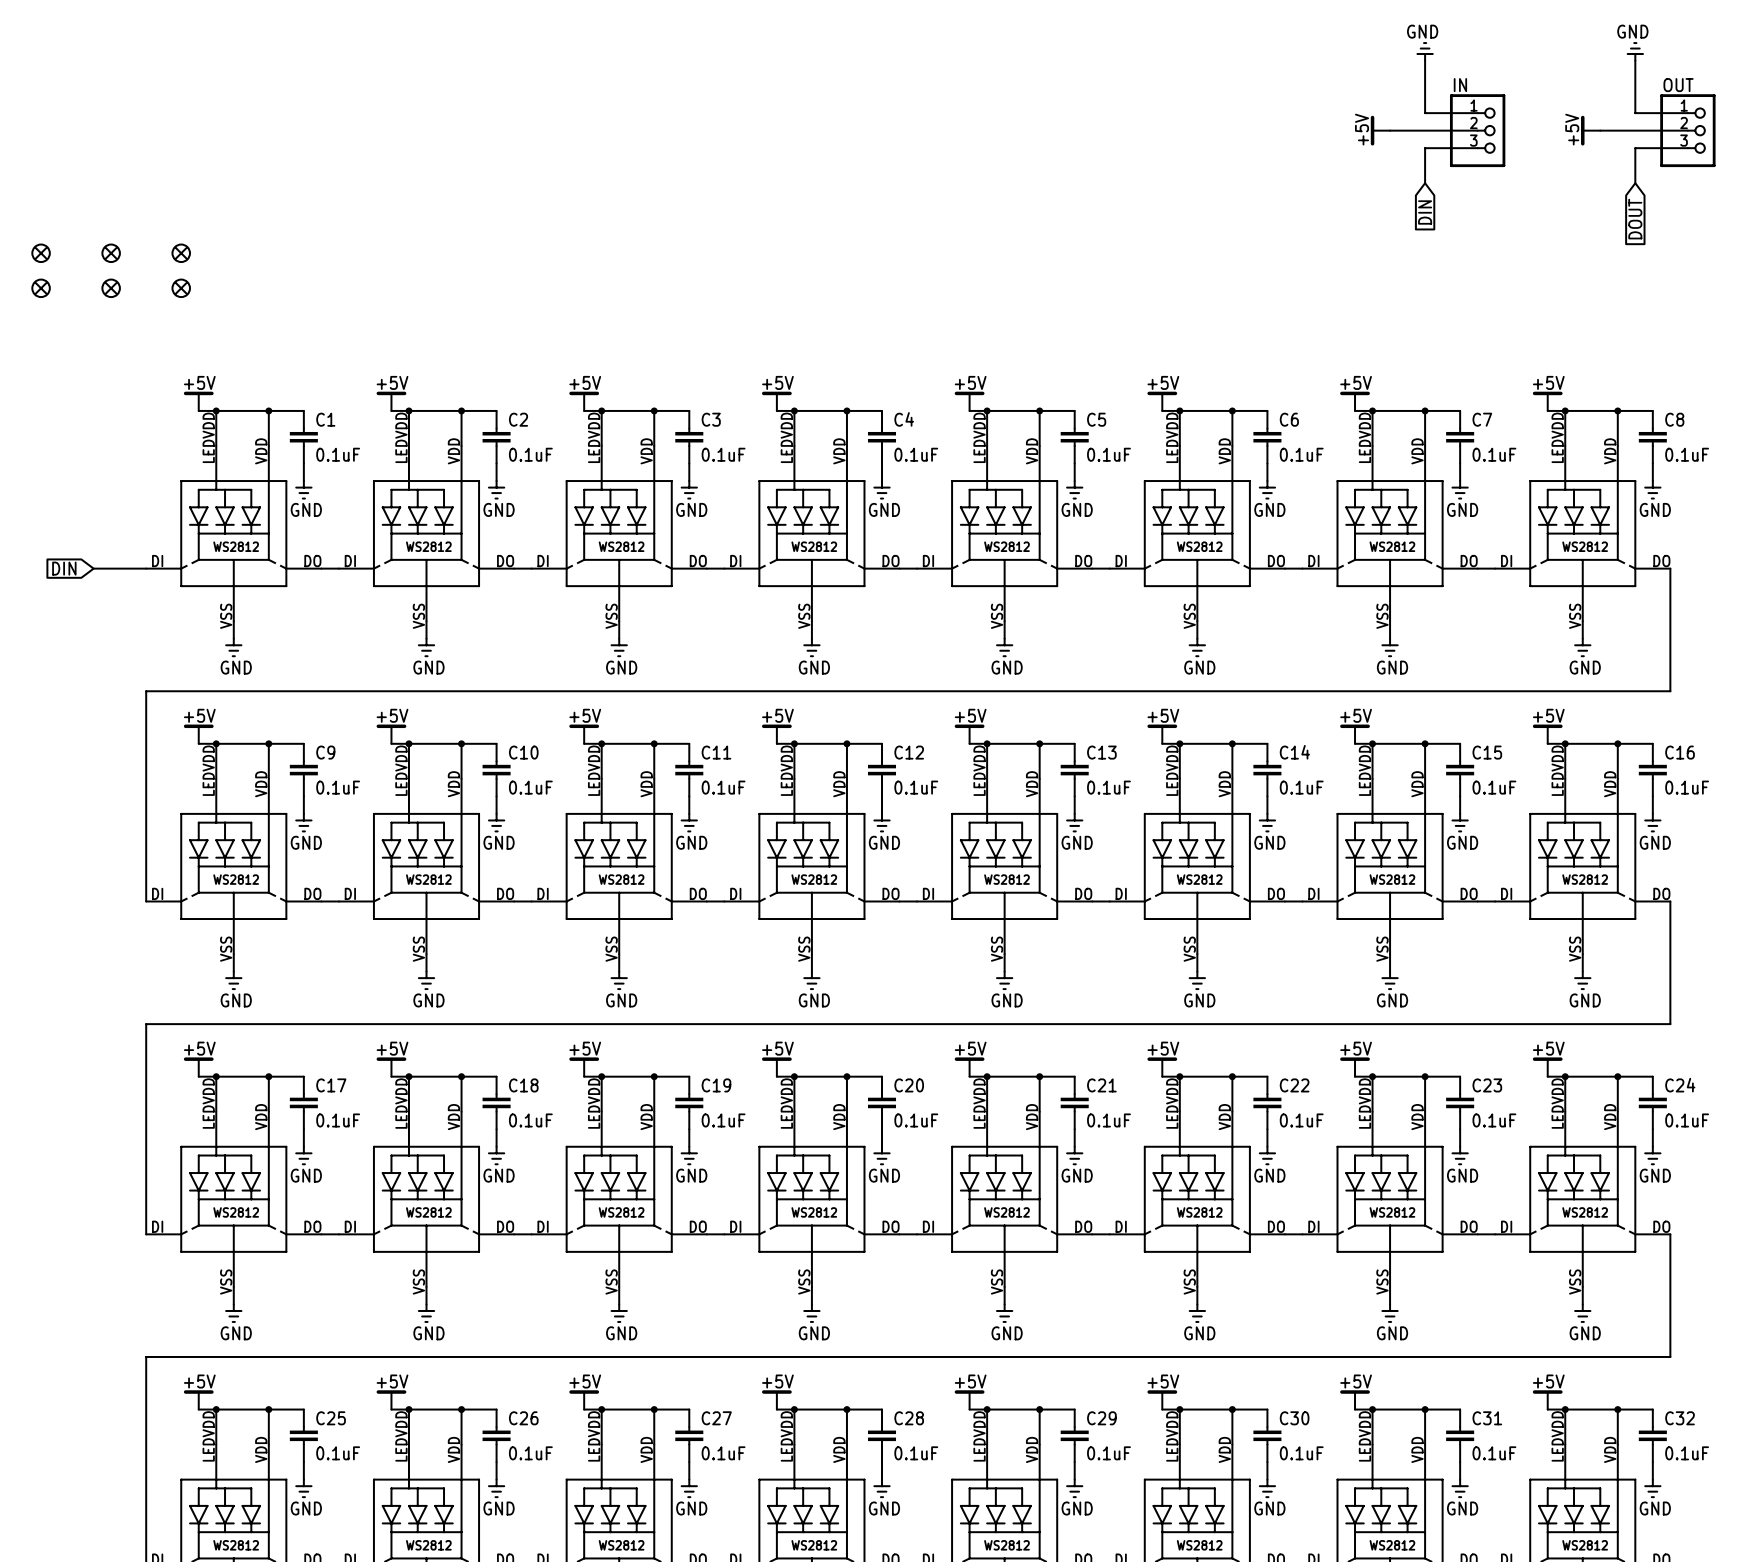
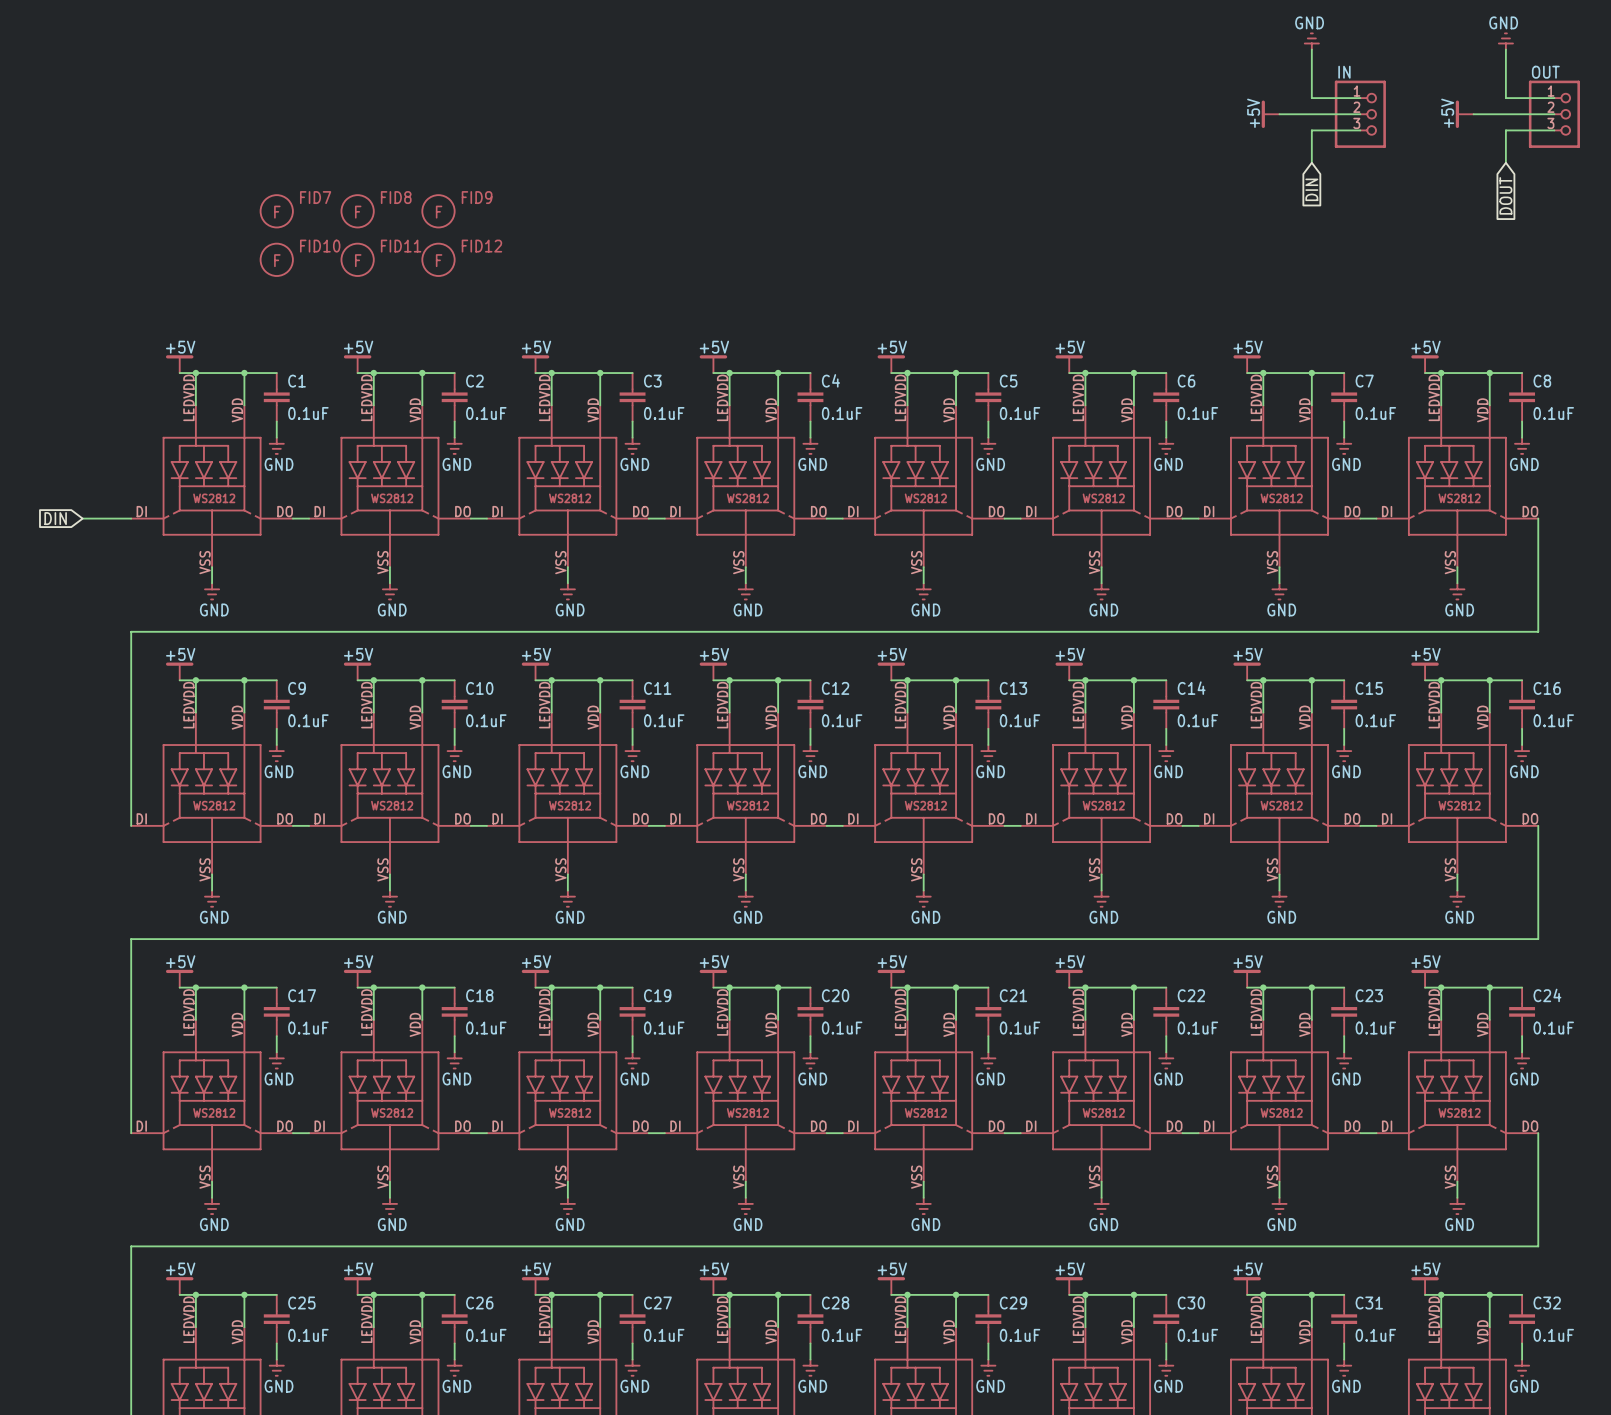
FID7: none -> (276, 211)
FID8: none -> (357, 211)
FID9: none -> (438, 211)
part: (41, 253) -> none
part: (111, 253) -> none
part: (181, 253) -> none
part: (41, 288) -> none
part: (111, 288) -> none
part: (181, 288) -> none
FID10: none -> (276, 259)
FID11: none -> (357, 259)
FID12: none -> (438, 259)

